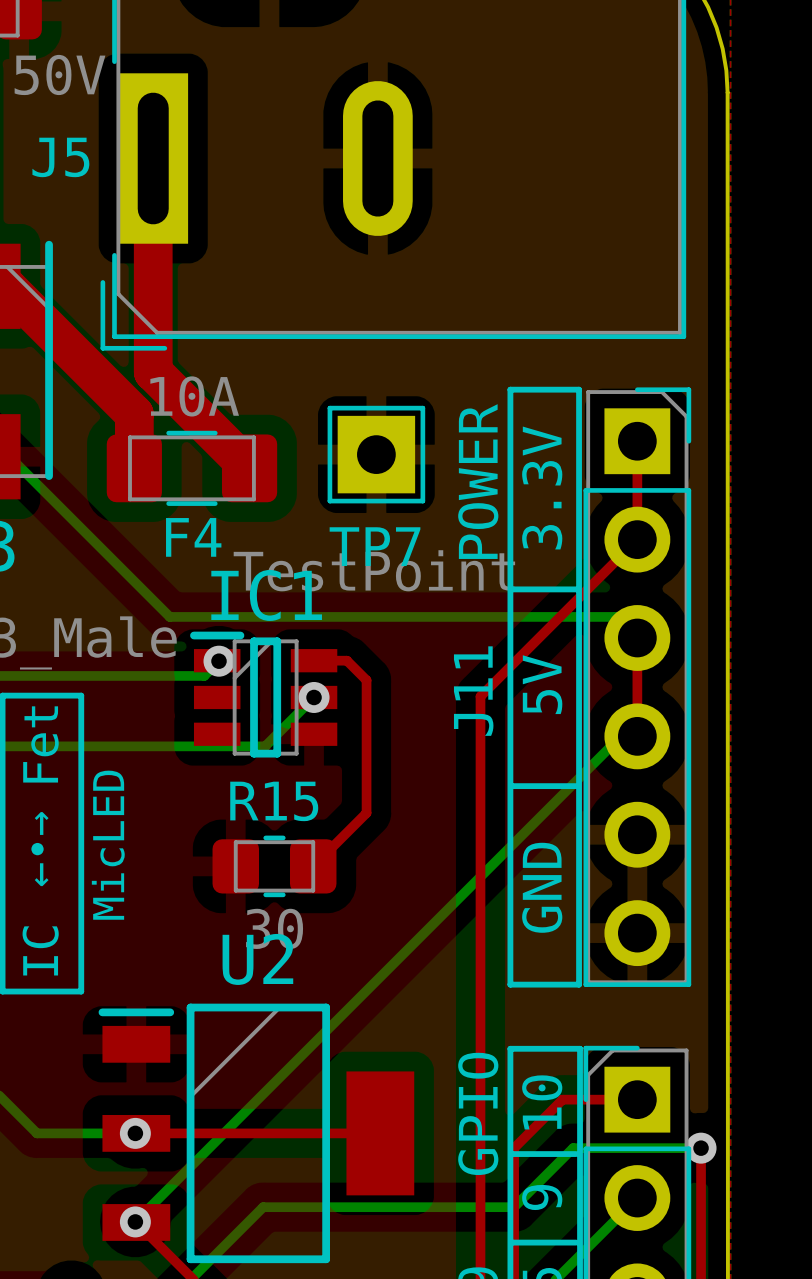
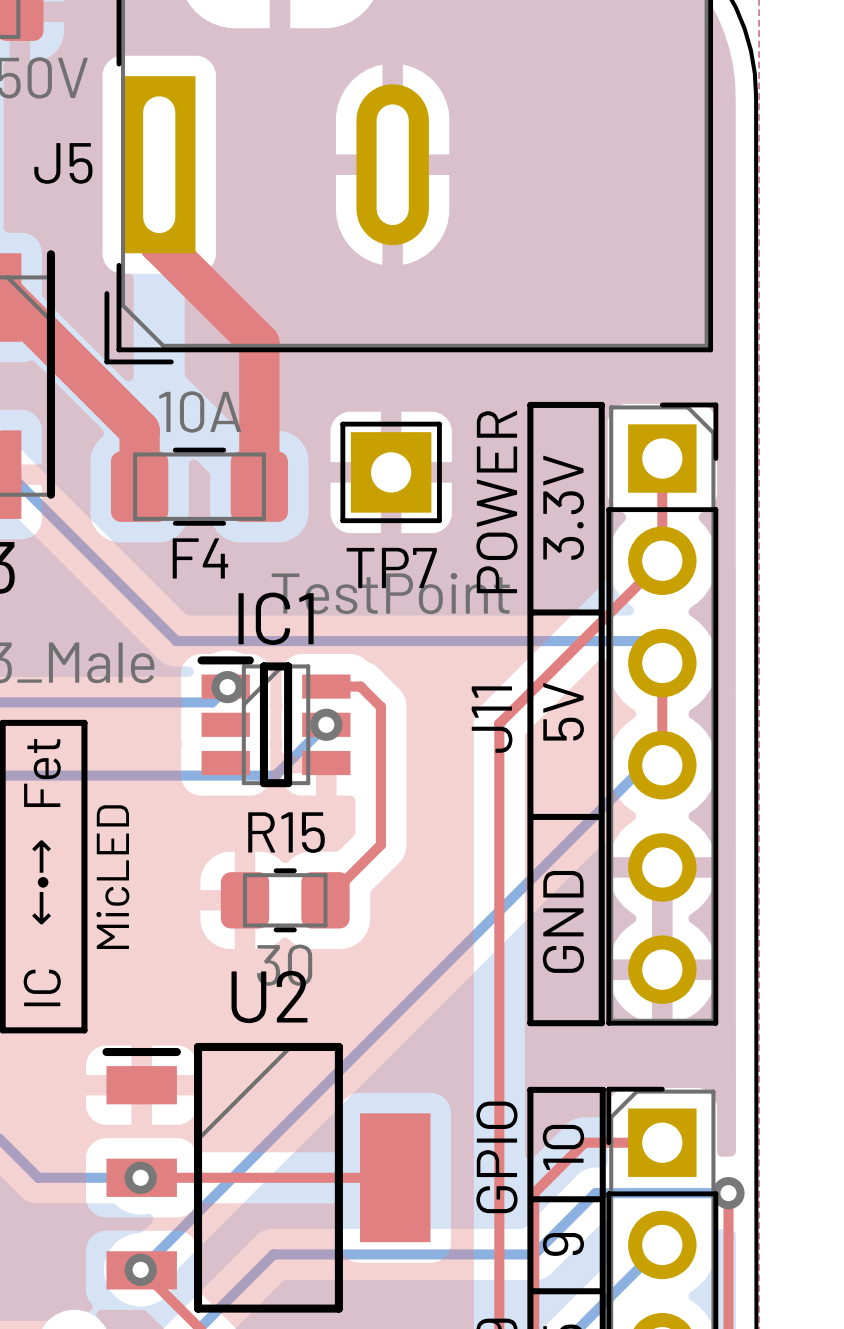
top track: (153, 234) (153, 372) (249, 468) -> (159, 243) (259, 343) (259, 486)

